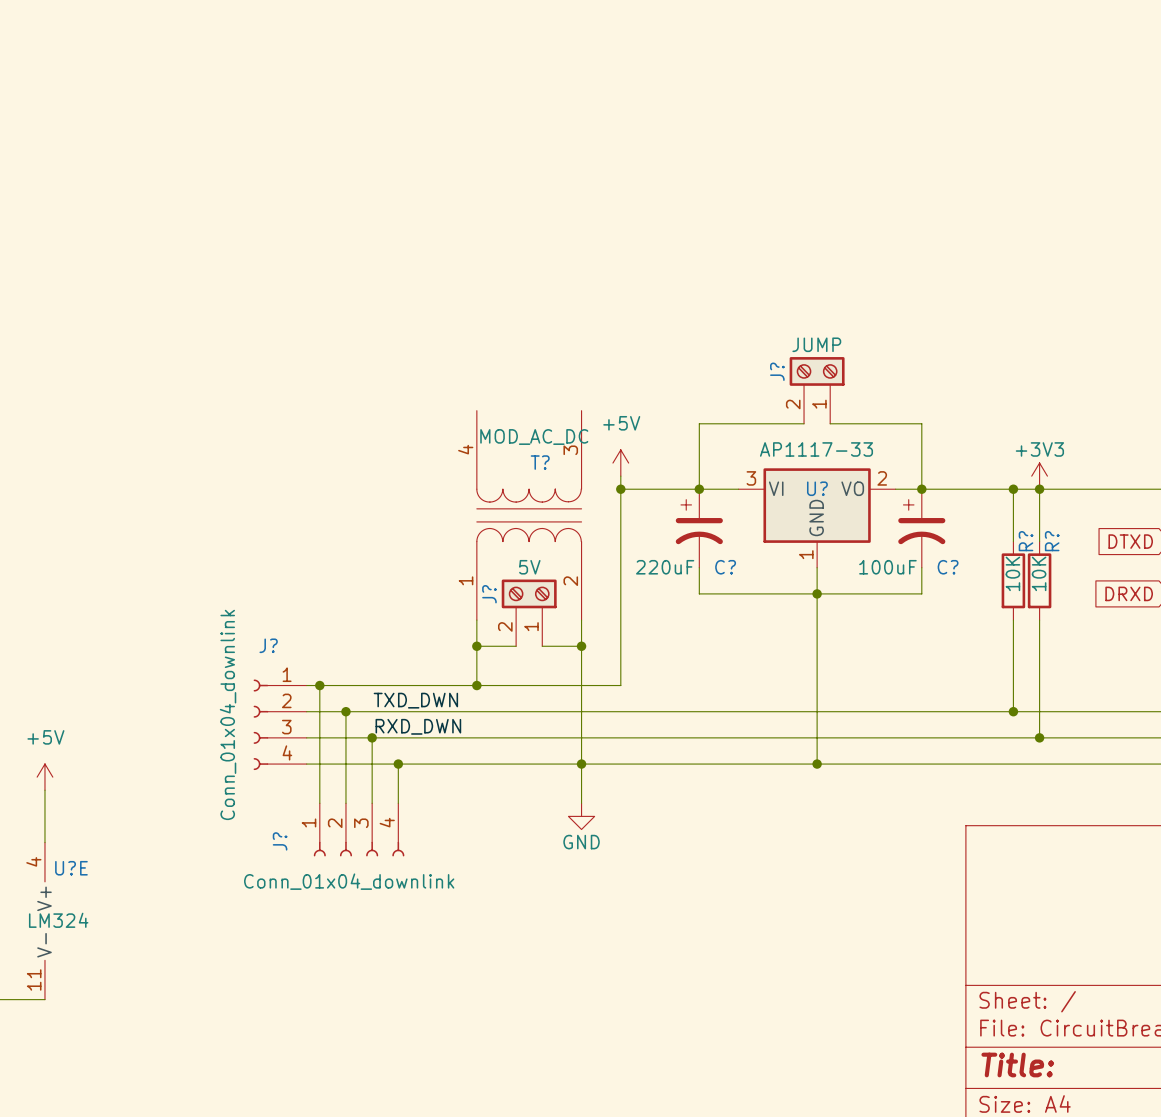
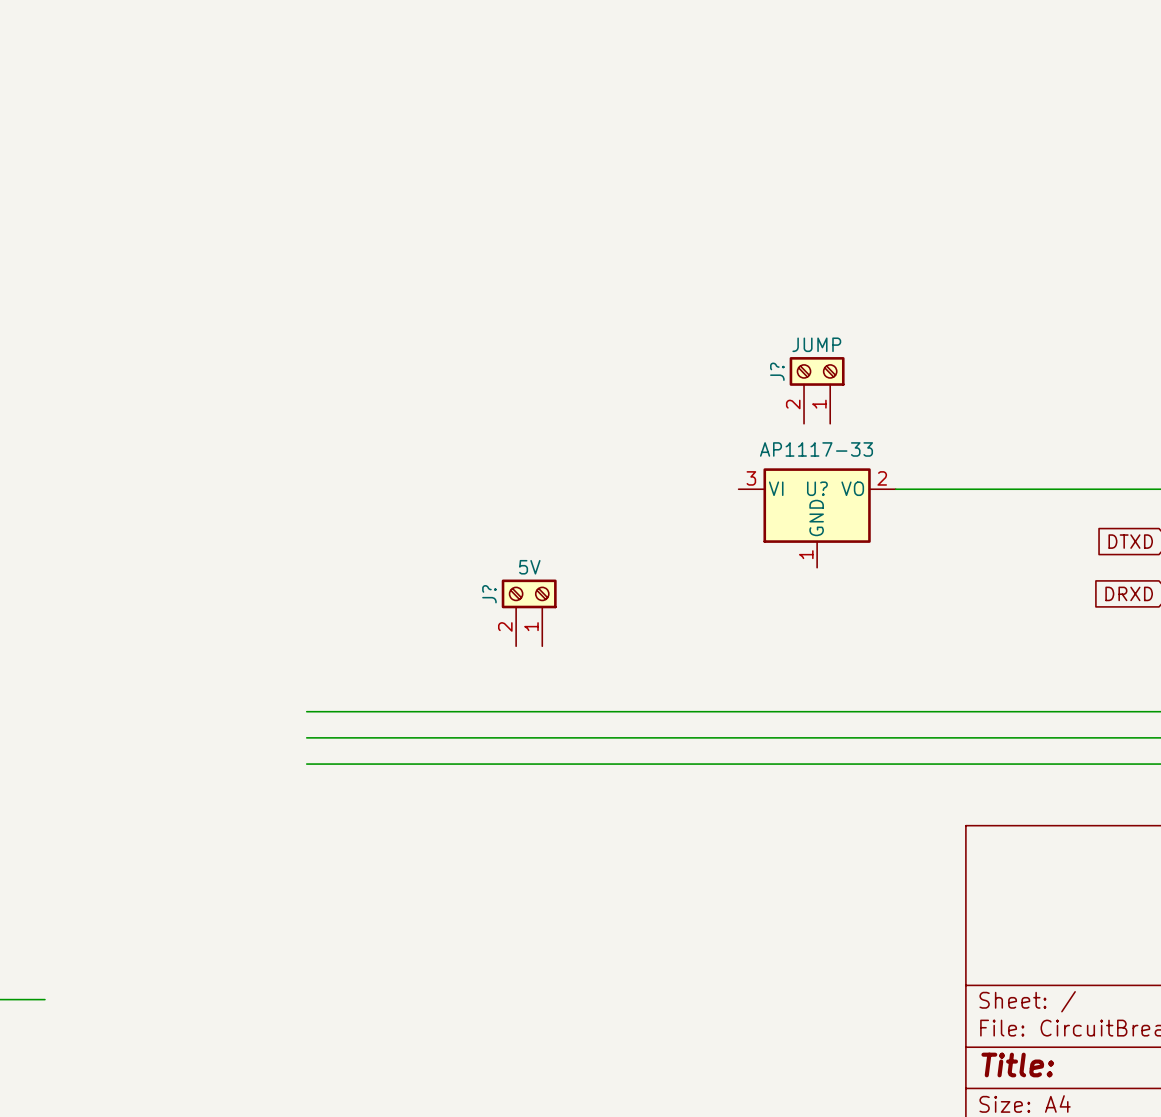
wire: (804, 423) (699, 423) (699, 489) -> none
wire: (830, 423) (921, 423) (921, 489) -> none
power symbol: +5V (620, 463) -> none
wire: (620, 476) (620, 685) (306, 685) -> none
power symbol: +3V3 (1039, 476) -> none
wire: (620, 489) (738, 489) -> none
junction: (620, 489) -> none
junction: (699, 489) -> none
junction: (921, 489) -> none
wire: (1013, 489) (1013, 541) -> none
junction: (1013, 489) -> none
wire: (1039, 489) (1039, 541) -> none
junction: (1039, 489) -> none
T?: MOD_AC_DC (529, 515) -> none
C?: 220uF (699, 528) -> none
C?: 100uF (921, 528) -> none
wire: (699, 567) (699, 593) (921, 593) (921, 567) -> none
wire: (817, 567) (817, 764) -> none
R?: 10K (1013, 580) -> none
R?: 10K (1039, 580) -> none
junction: (817, 593) -> none
wire: (476, 620) (476, 685) -> none
wire: (581, 620) (581, 803) -> none
wire: (1013, 620) (1013, 711) -> none
wire: (1039, 620) (1039, 737) -> none
wire: (476, 646) (516, 646) -> none
junction: (476, 646) -> none
wire: (542, 646) (581, 646) -> none
junction: (581, 646) -> none
wire: (319, 685) (319, 803) -> none
junction: (319, 685) -> none
junction: (476, 685) -> none
label: TXD_DWN (415, 700) -> none
wire: (345, 711) (345, 803) -> none
junction: (345, 711) -> none
junction: (1013, 711) -> none
J?: Conn_01x04_downlink (280, 724) -> none
label: RXD_DWN (418, 726) -> none
wire: (372, 737) (372, 803) -> none
junction: (372, 737) -> none
junction: (1039, 737) -> none
wire: (398, 764) (398, 803) -> none
junction: (398, 764) -> none
junction: (581, 764) -> none
junction: (817, 764) -> none
power symbol: +5V (44, 777) -> none
wire: (44, 790) (44, 842) -> none
power symbol: GND (581, 816) -> none
J?: Conn_01x04_downlink (359, 829) -> none
U?E: LM324 (44, 921) -> none

